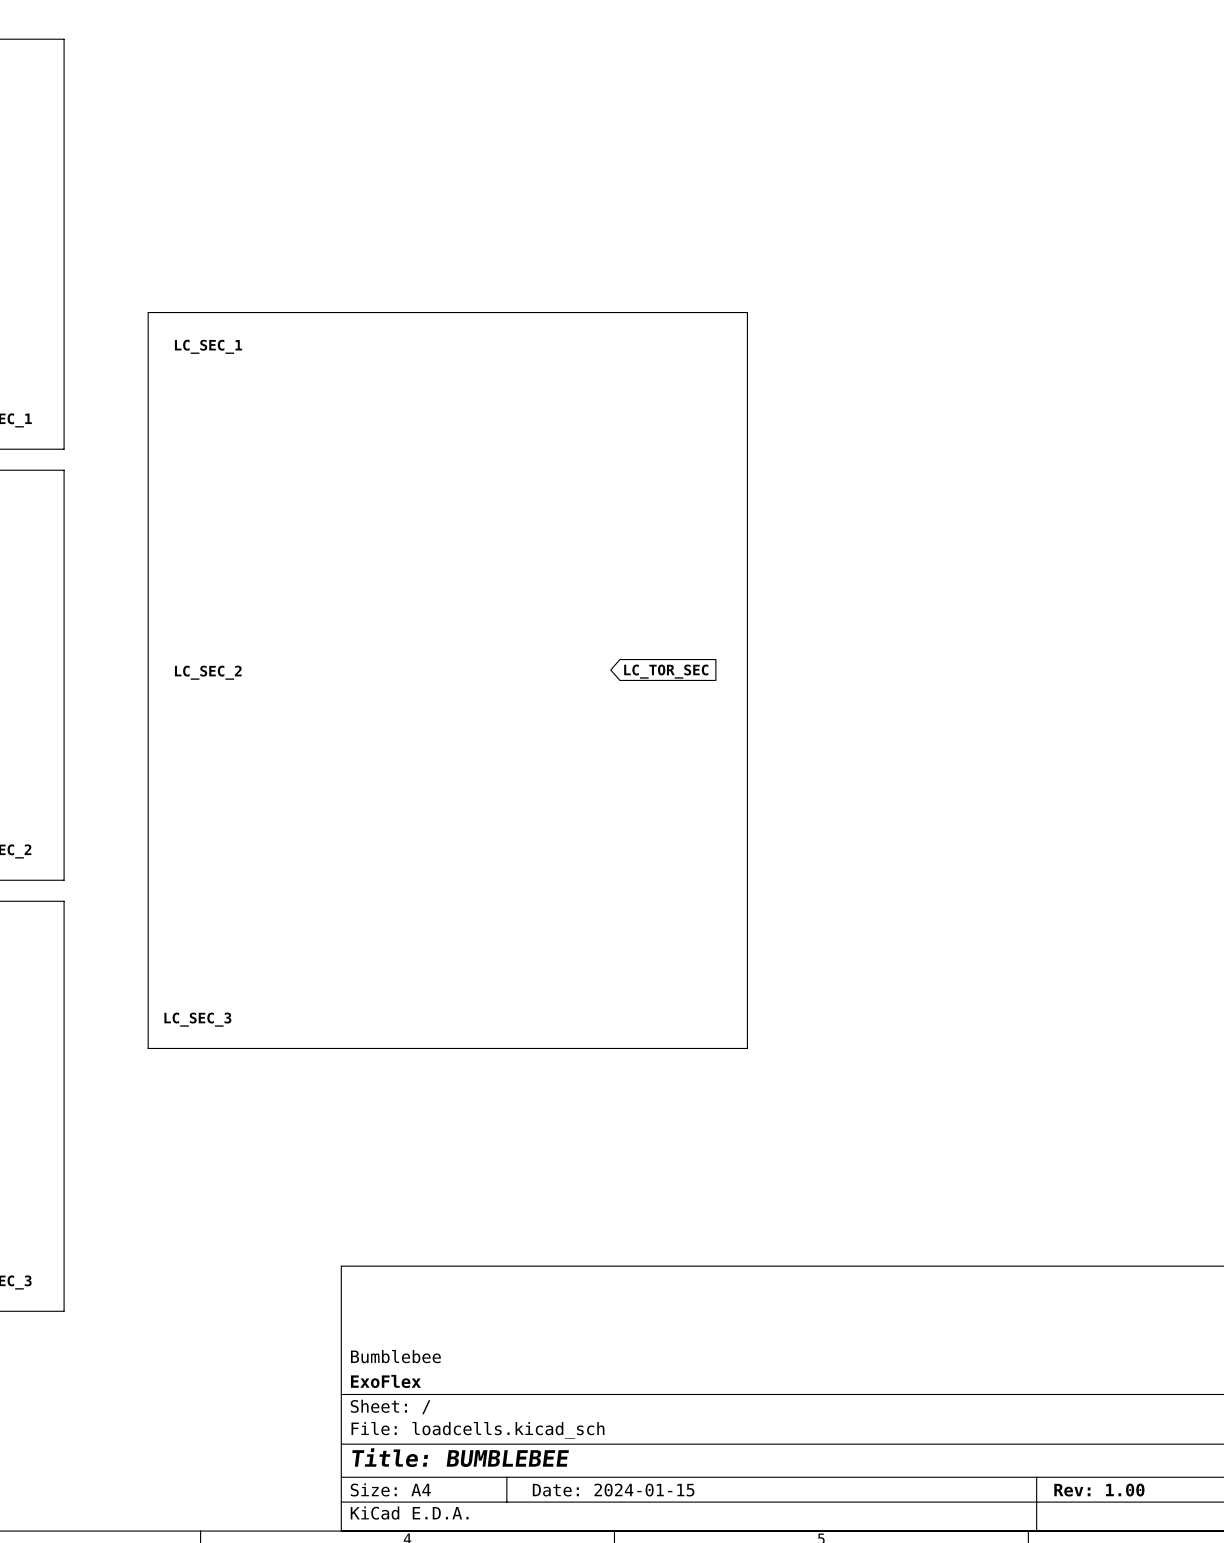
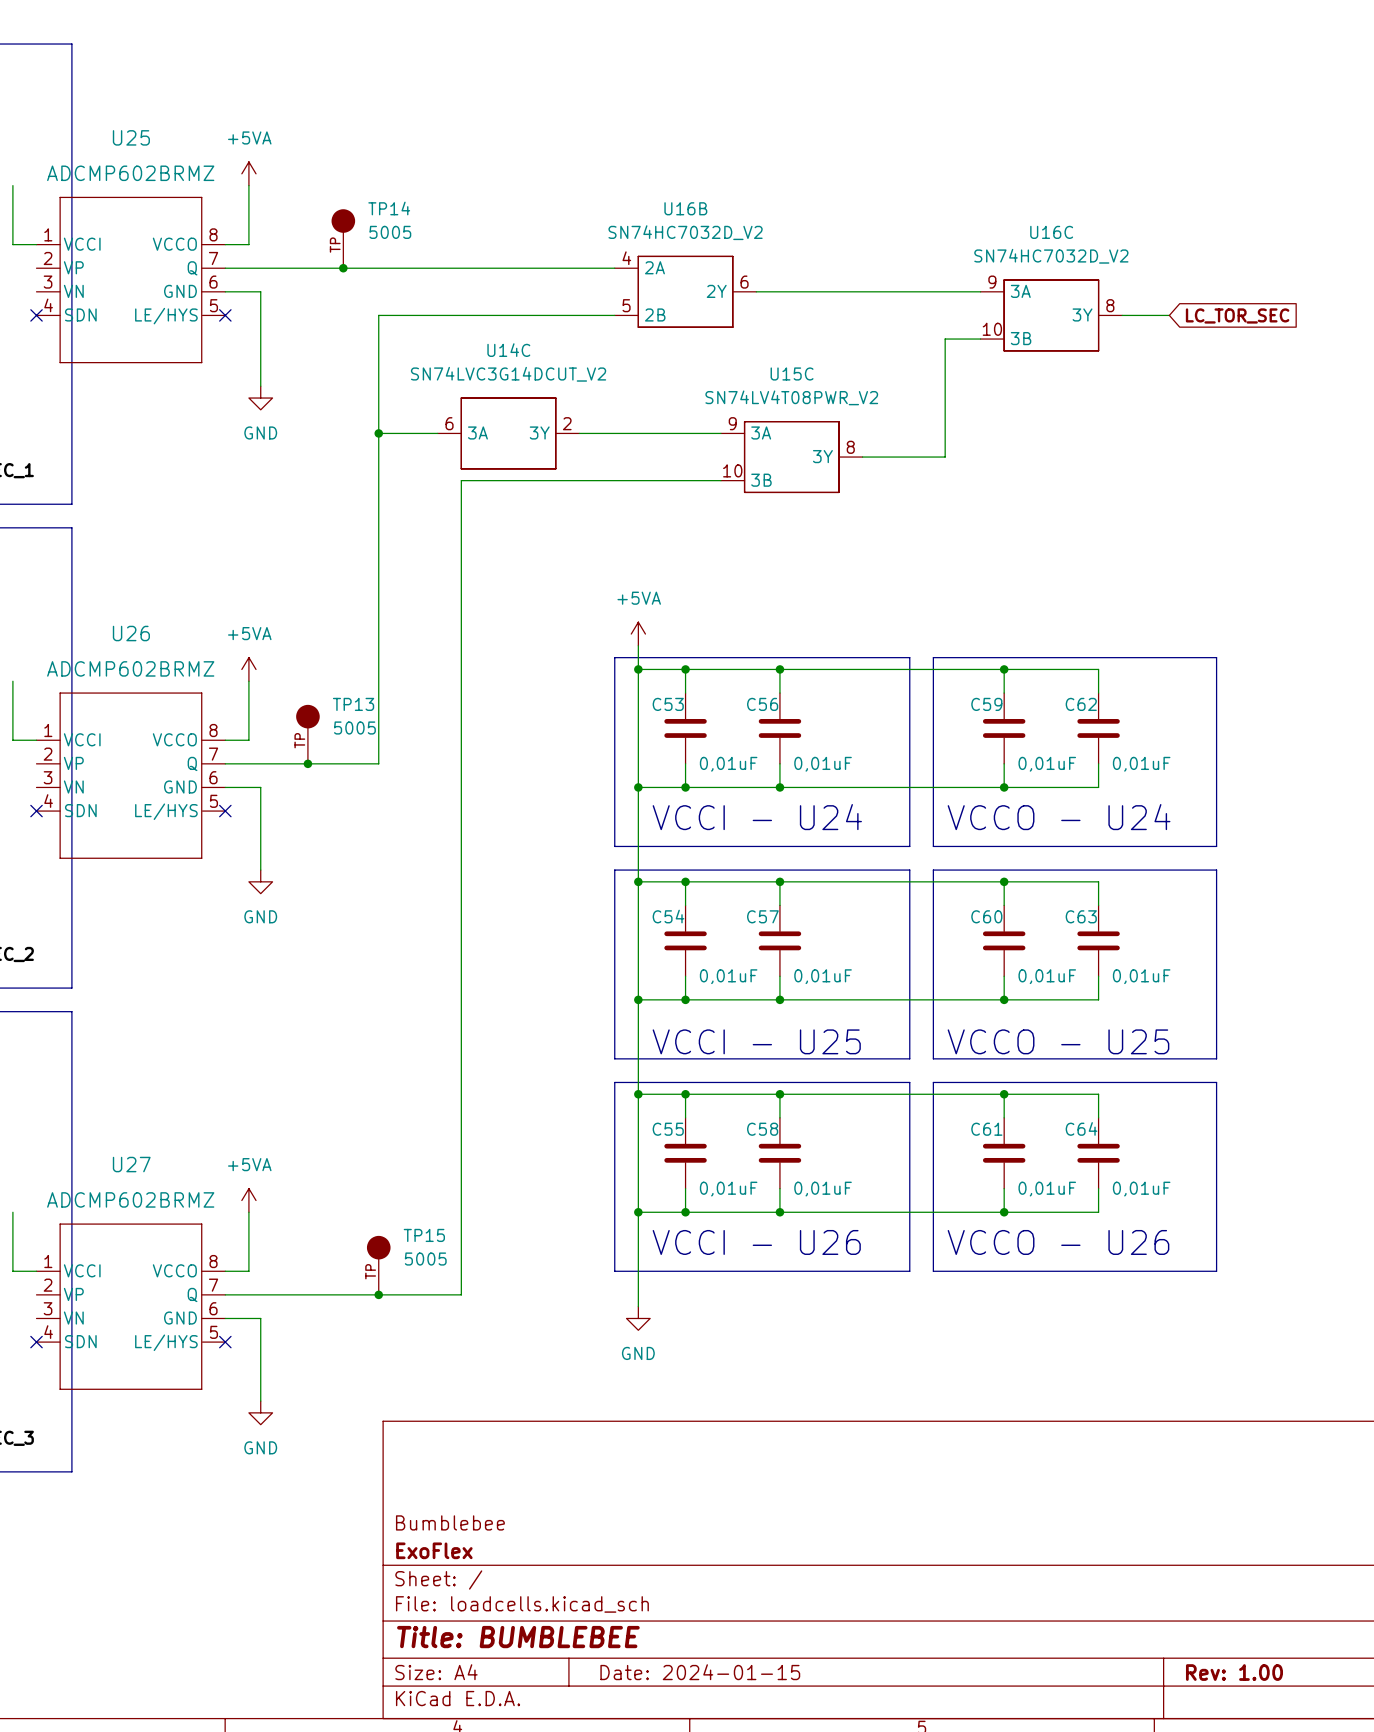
power symbol: none -> +5VA (248, 173)
wire: none -> (12, 185) (12, 244) (36, 244)
wire: none -> (248, 185) (248, 244) (225, 244)
TP14: none -> 5005 (343, 238)
wire: none -> (225, 268) (614, 268)
junction: none -> (343, 268)
U25: none -> ADCMP602BRMZ (130, 280)
wire: none -> (225, 291) (260, 291) (260, 386)
U16B: none -> SN74HC7032D_V2 (685, 291)
wire: none -> (756, 291) (980, 291)
no-connect mark: none -> (36, 315)
no-connect mark: none -> (225, 315)
wire: none -> (614, 315) (378, 315) (378, 763) (225, 763)
U16C: none -> SN74HC7032D_V2 (1051, 315)
wire: none -> (1122, 315) (1169, 315)
global label: none -> LC_TOR_SEC (1237, 315)
wire: none -> (980, 339) (945, 339) (945, 457) (862, 457)
line: (148, 312) (747, 312) (747, 1048) (148, 1048) (148, 312) -> none
label: LC_SEC_1 (208, 346) -> none
power symbol: none -> GND (260, 398)
wire: none -> (378, 433) (437, 433)
junction: none -> (378, 433)
U14C: none -> SN74LVC3G14DCUT_V2 (508, 433)
wire: none -> (579, 433) (720, 433)
U15C: none -> SN74LV4T08PWR_V2 (791, 457)
wire: none -> (720, 480) (461, 480) (461, 1294) (225, 1294)
power symbol: none -> +5VA (638, 634)
wire: none -> (638, 645) (638, 1306)
line: none -> (614, 657) (614, 846) (909, 846) (909, 657) (614, 657)
line: none -> (933, 657) (933, 846) (1216, 846) (1216, 657) (933, 657)
power symbol: none -> +5VA (248, 669)
wire: none -> (638, 669) (1098, 669) (1098, 693)
junction: none -> (638, 669)
wire: none -> (685, 669) (685, 693)
junction: none -> (685, 669)
wire: none -> (779, 669) (779, 693)
junction: none -> (779, 669)
wire: none -> (1004, 669) (1004, 693)
junction: none -> (1004, 669)
wire: none -> (12, 681) (12, 740) (36, 740)
wire: none -> (248, 681) (248, 740) (225, 740)
C53: none -> 0,01uF (685, 728)
C56: none -> 0,01uF (779, 728)
C59: none -> 0,01uF (1004, 728)
C62: none -> 0,01uF (1098, 728)
TP13: none -> 5005 (307, 734)
global label: LC_TOR_SEC (666, 671) -> none
label: LC_SEC_2 (208, 672) -> none
junction: none -> (307, 763)
wire: none -> (685, 763) (685, 787)
wire: none -> (779, 763) (779, 787)
wire: none -> (1004, 763) (1004, 787)
wire: none -> (1098, 763) (1098, 787) (638, 787)
U26: none -> ADCMP602BRMZ (130, 775)
wire: none -> (225, 787) (260, 787) (260, 870)
junction: none -> (638, 787)
junction: none -> (685, 787)
junction: none -> (779, 787)
junction: none -> (1004, 787)
no-connect mark: none -> (36, 811)
no-connect mark: none -> (225, 811)
text: none -> VCCI - U24 (757, 817)
text: none -> VCCO - U24 (1059, 817)
line: none -> (614, 870) (614, 1058) (909, 1058) (909, 870) (614, 870)
line: none -> (933, 870) (933, 1058) (1216, 1058) (1216, 870) (933, 870)
power symbol: none -> GND (260, 881)
wire: none -> (638, 881) (1098, 881) (1098, 905)
junction: none -> (638, 881)
wire: none -> (685, 881) (685, 905)
junction: none -> (685, 881)
wire: none -> (779, 881) (779, 905)
junction: none -> (779, 881)
wire: none -> (1004, 881) (1004, 905)
junction: none -> (1004, 881)
C54: none -> 0,01uF (685, 940)
C57: none -> 0,01uF (779, 940)
C60: none -> 0,01uF (1004, 940)
C63: none -> 0,01uF (1098, 940)
wire: none -> (685, 976) (685, 999)
wire: none -> (779, 976) (779, 999)
wire: none -> (1004, 976) (1004, 999)
wire: none -> (1098, 976) (1098, 999) (638, 999)
junction: none -> (638, 999)
junction: none -> (685, 999)
junction: none -> (779, 999)
junction: none -> (1004, 999)
text: none -> VCCI - U25 (756, 1041)
text: none -> VCCO - U25 (1058, 1041)
line: none -> (614, 1082) (614, 1271) (909, 1271) (909, 1082) (614, 1082)
line: none -> (933, 1082) (933, 1271) (1216, 1271) (1216, 1082) (933, 1082)
wire: none -> (638, 1094) (1098, 1094) (1098, 1117)
junction: none -> (638, 1094)
wire: none -> (685, 1094) (685, 1117)
junction: none -> (685, 1094)
wire: none -> (779, 1094) (779, 1117)
junction: none -> (779, 1094)
wire: none -> (1004, 1094) (1004, 1117)
junction: none -> (1004, 1094)
label: LC_SEC_3 (197, 1019) -> none
C55: none -> 0,01uF (685, 1153)
C58: none -> 0,01uF (779, 1153)
C61: none -> 0,01uF (1004, 1153)
C64: none -> 0,01uF (1098, 1153)
wire: none -> (685, 1188) (685, 1212)
wire: none -> (779, 1188) (779, 1212)
wire: none -> (1004, 1188) (1004, 1212)
wire: none -> (1098, 1188) (1098, 1212) (638, 1212)
power symbol: none -> +5VA (248, 1200)
wire: none -> (12, 1212) (12, 1271) (36, 1271)
wire: none -> (248, 1212) (248, 1271) (225, 1271)
junction: none -> (638, 1212)
junction: none -> (685, 1212)
junction: none -> (779, 1212)
junction: none -> (1004, 1212)
text: none -> VCCI - U26 (756, 1242)
text: none -> VCCO - U26 (1058, 1242)
TP15: none -> 5005 (378, 1265)
junction: none -> (378, 1294)
U27: none -> ADCMP602BRMZ (130, 1306)
wire: none -> (225, 1318) (260, 1318) (260, 1401)
power symbol: none -> GND (638, 1318)
no-connect mark: none -> (36, 1342)
no-connect mark: none -> (225, 1342)
power symbol: none -> GND (260, 1412)

